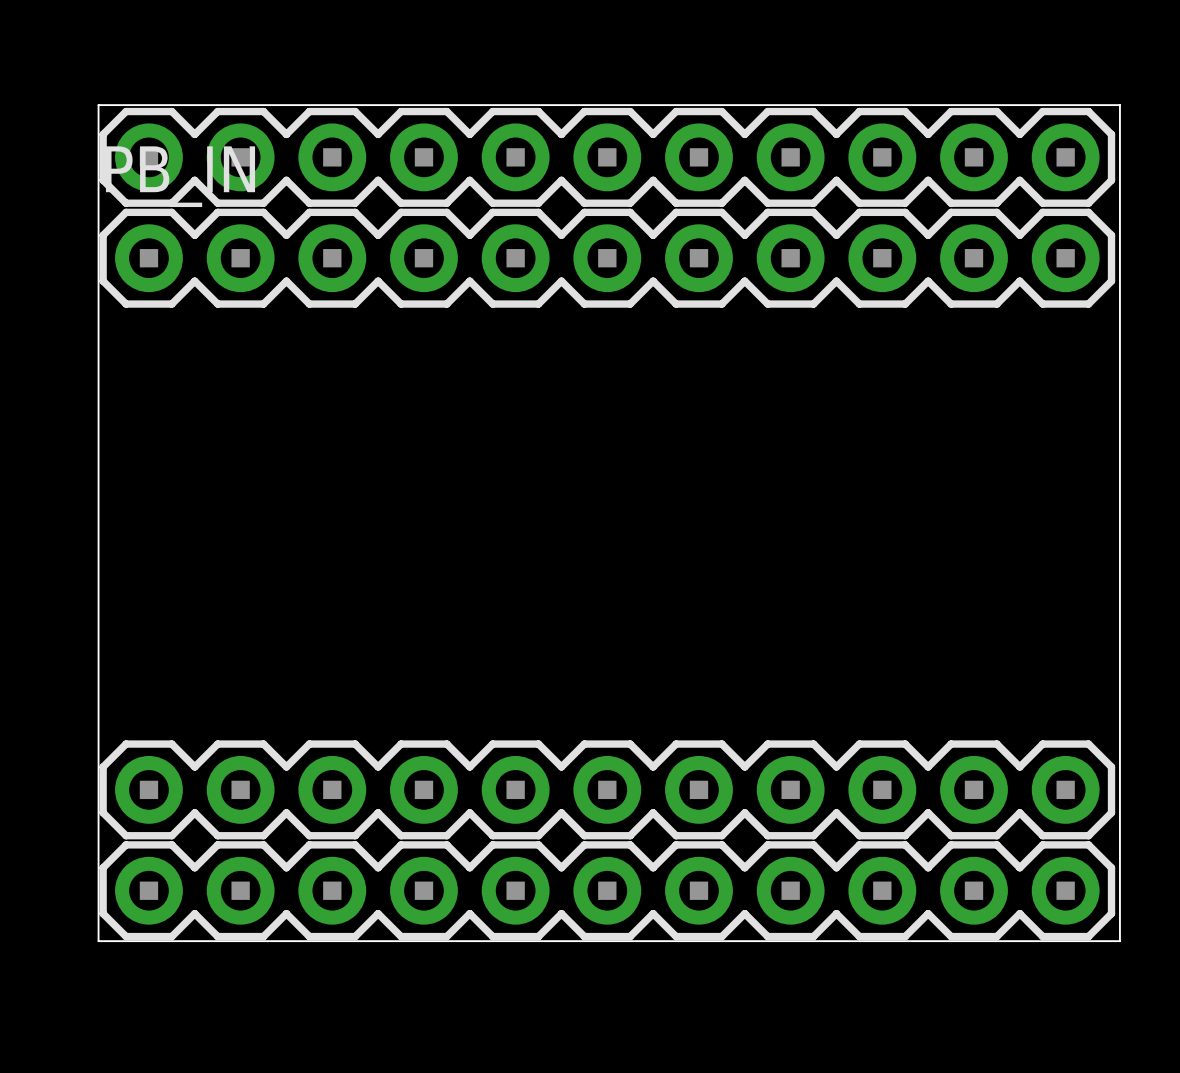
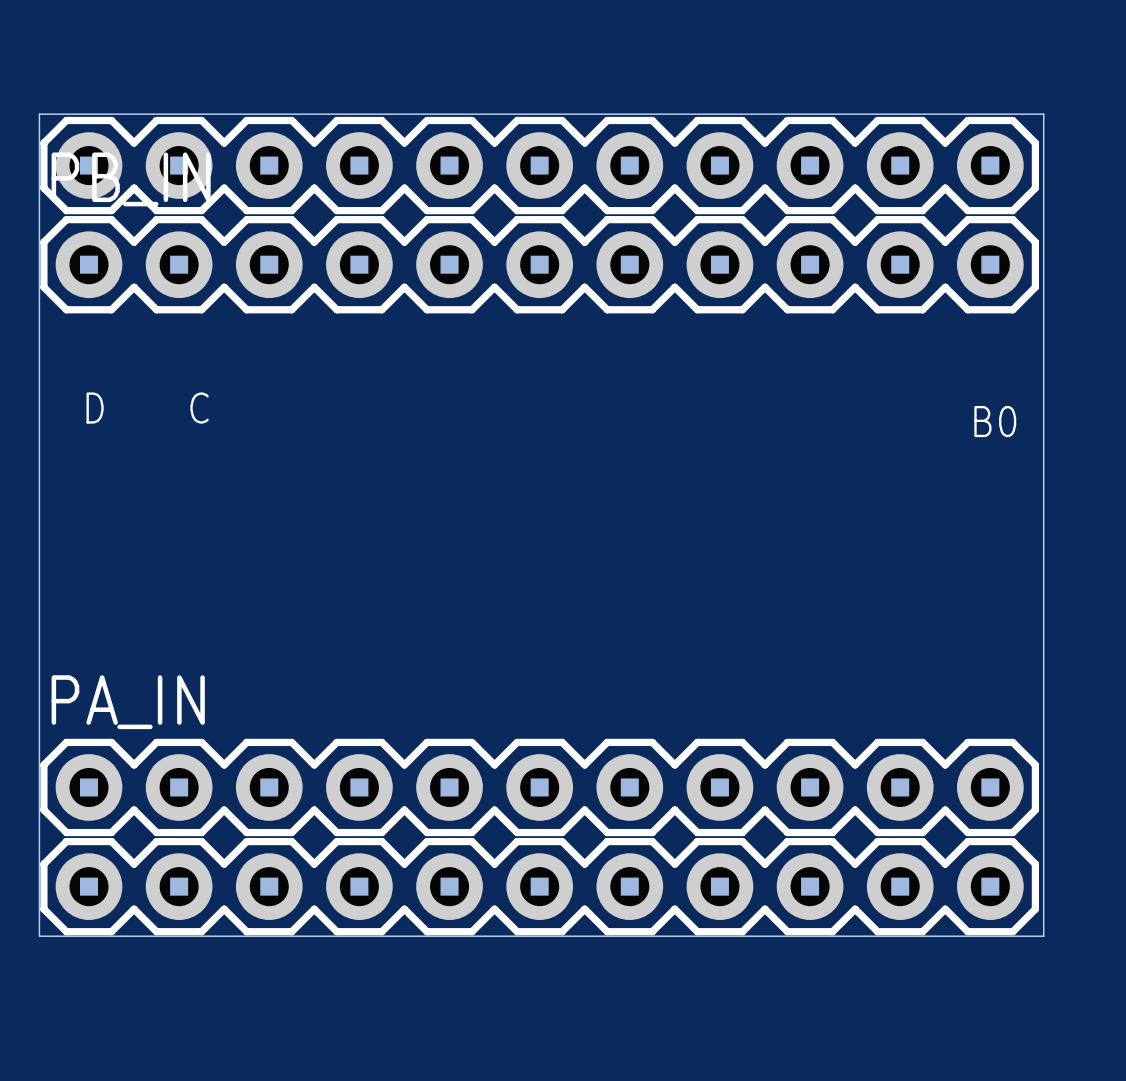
text: none -> D C (147, 408)
text: none -> B0 (995, 421)
PA_IN name: none -> PA_IN (128, 702)

